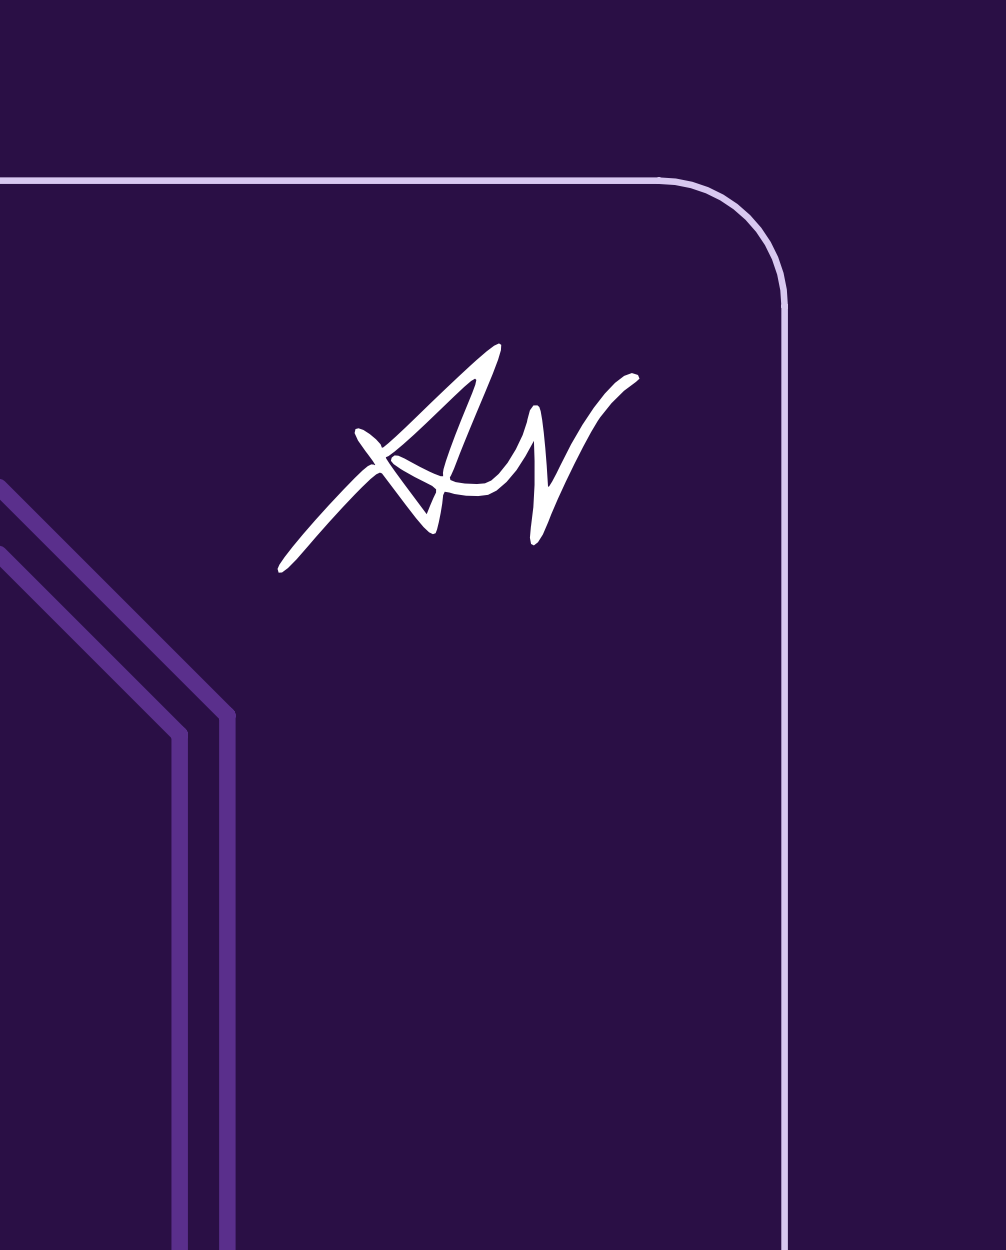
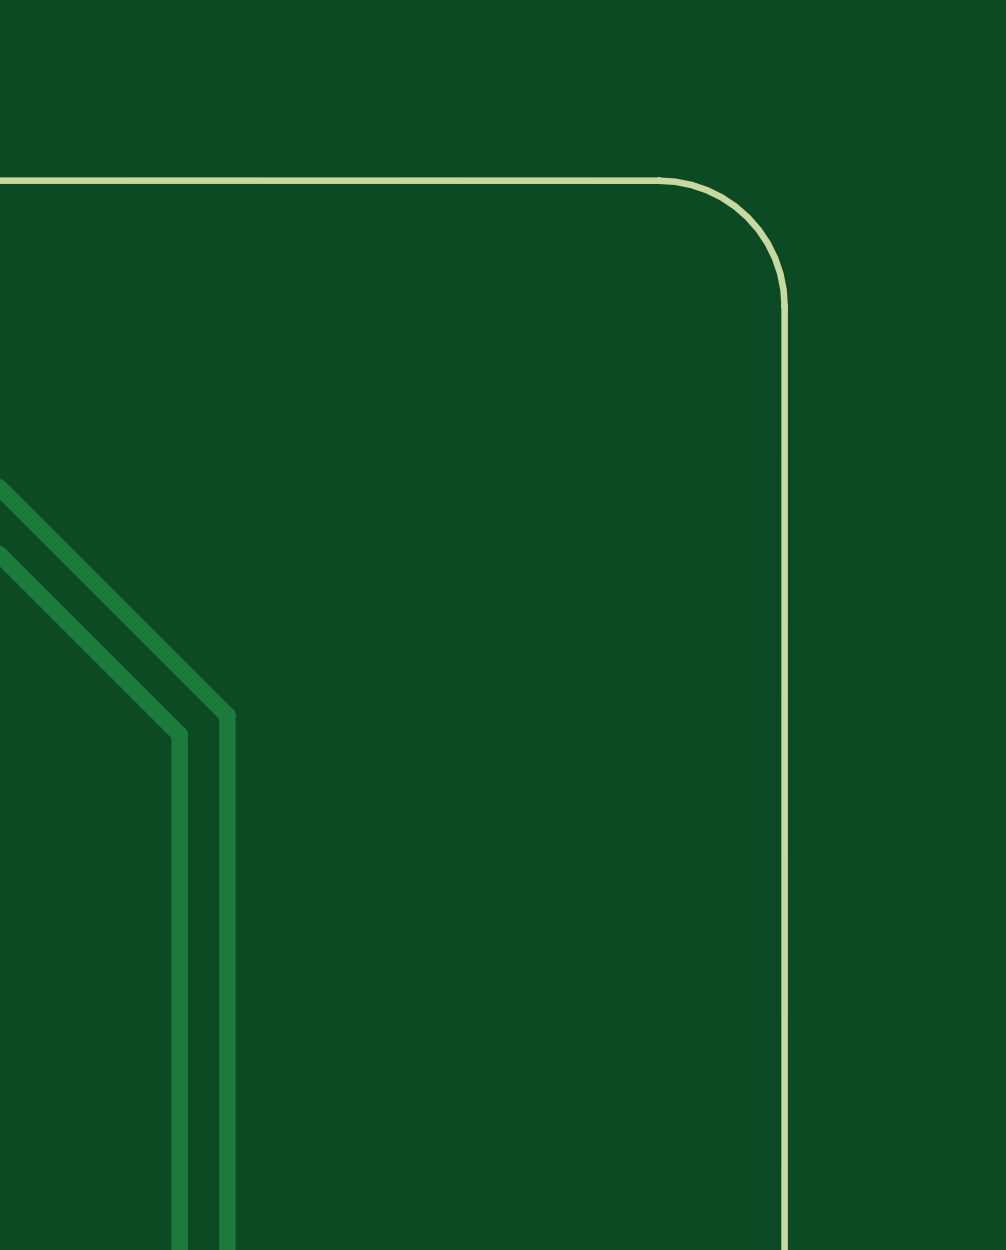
drawing: [277, 343, 640, 573] -> none

